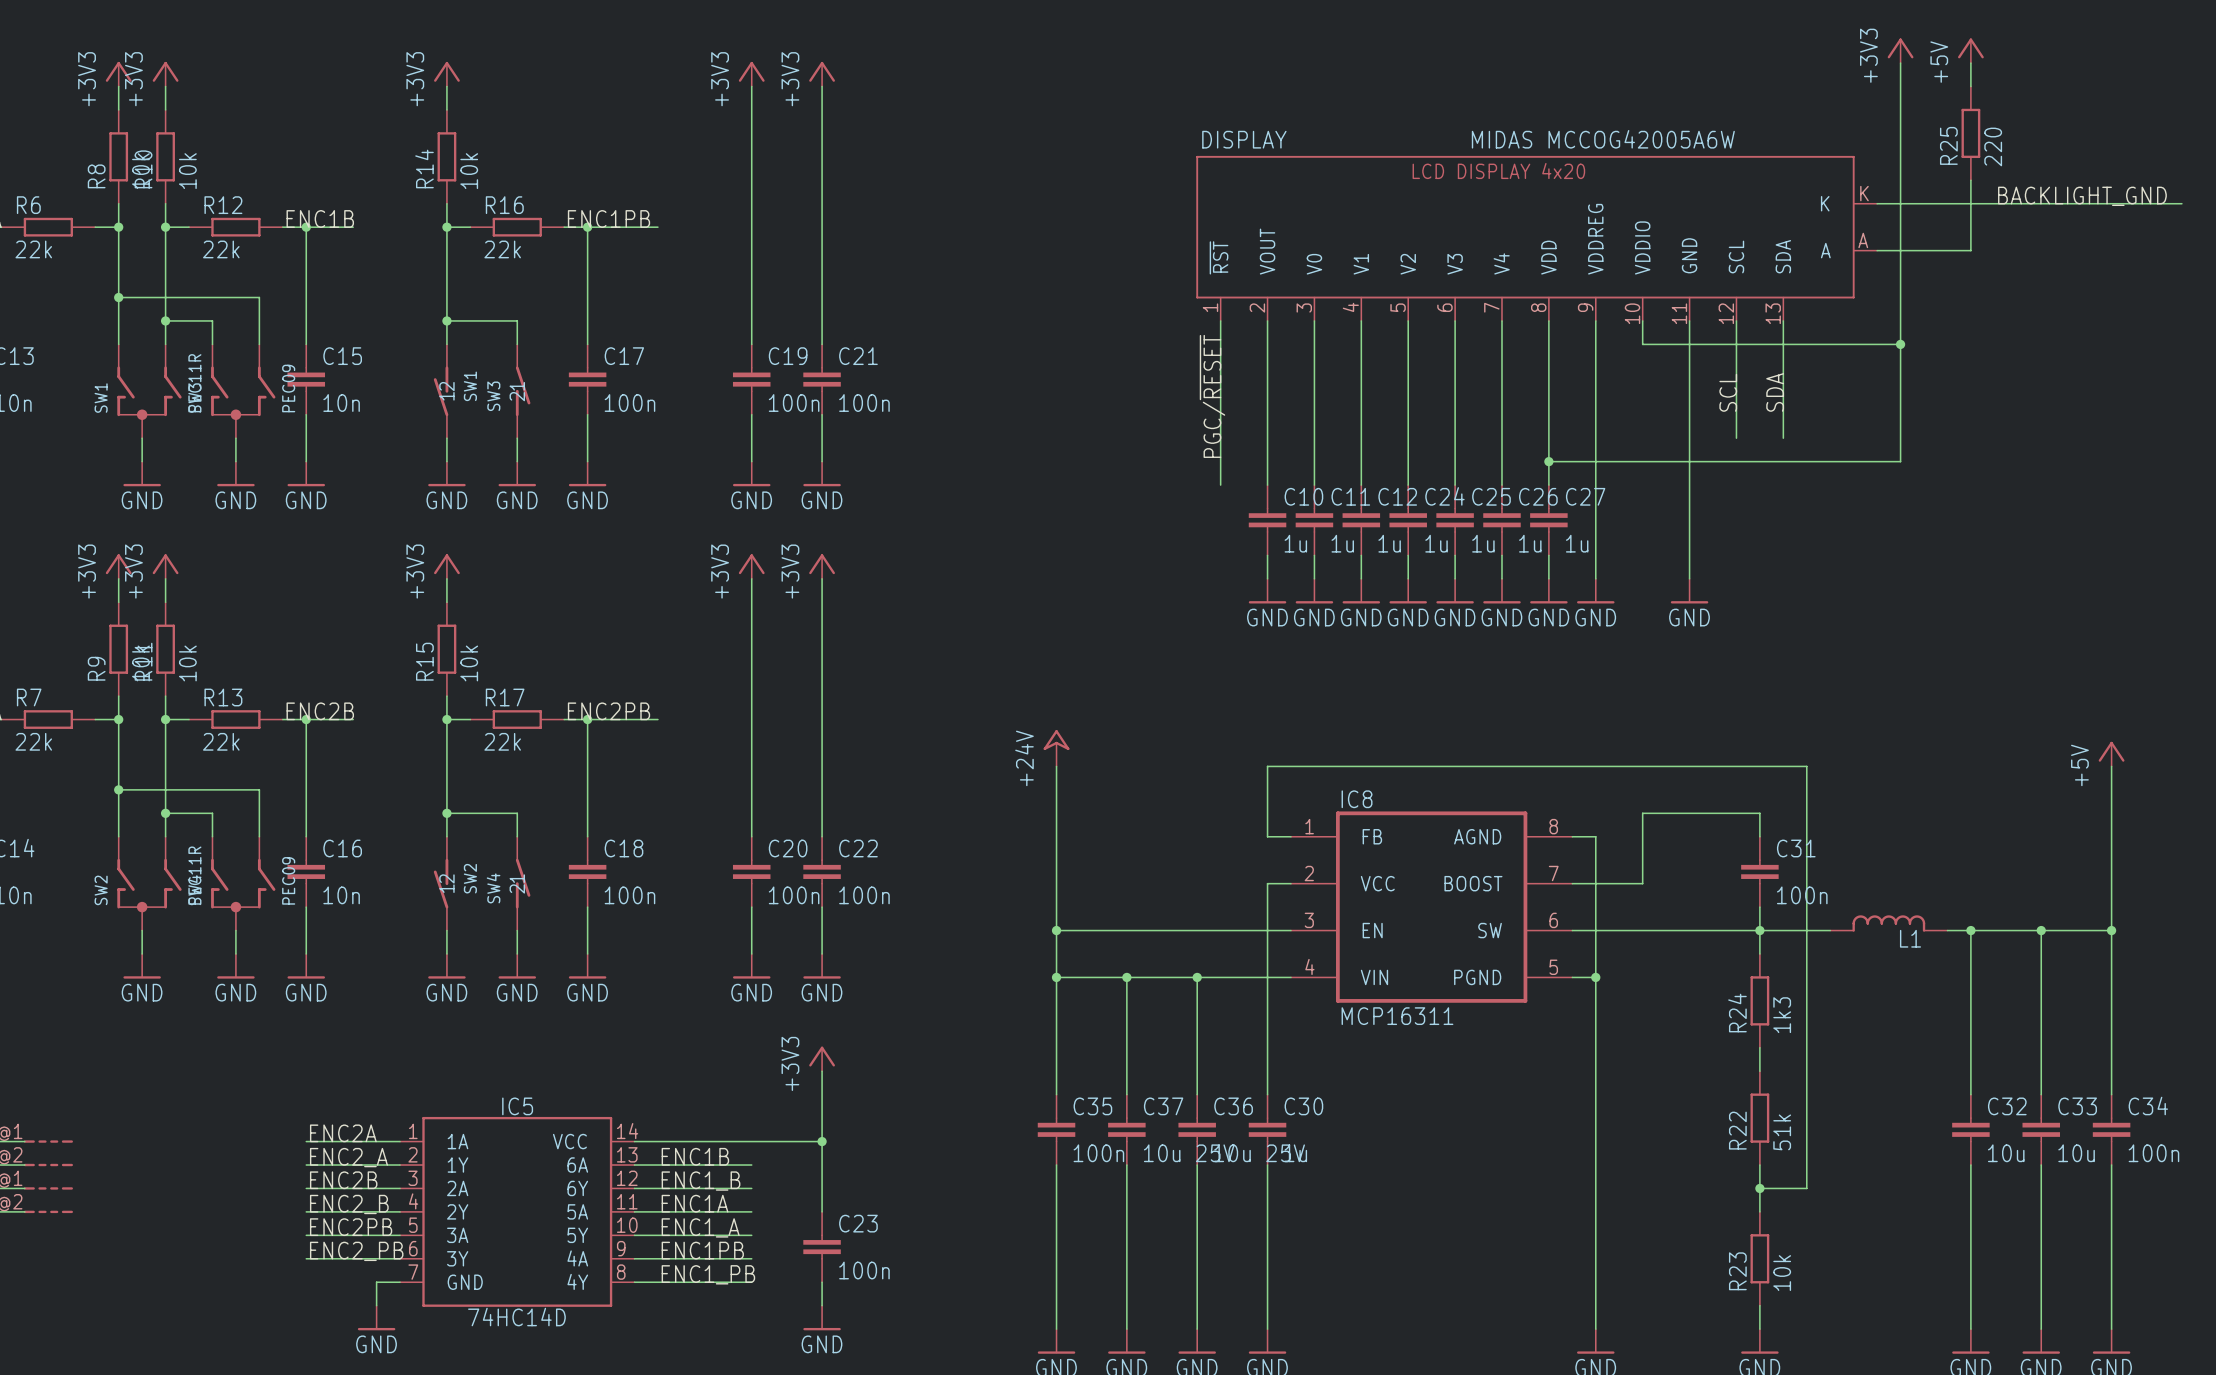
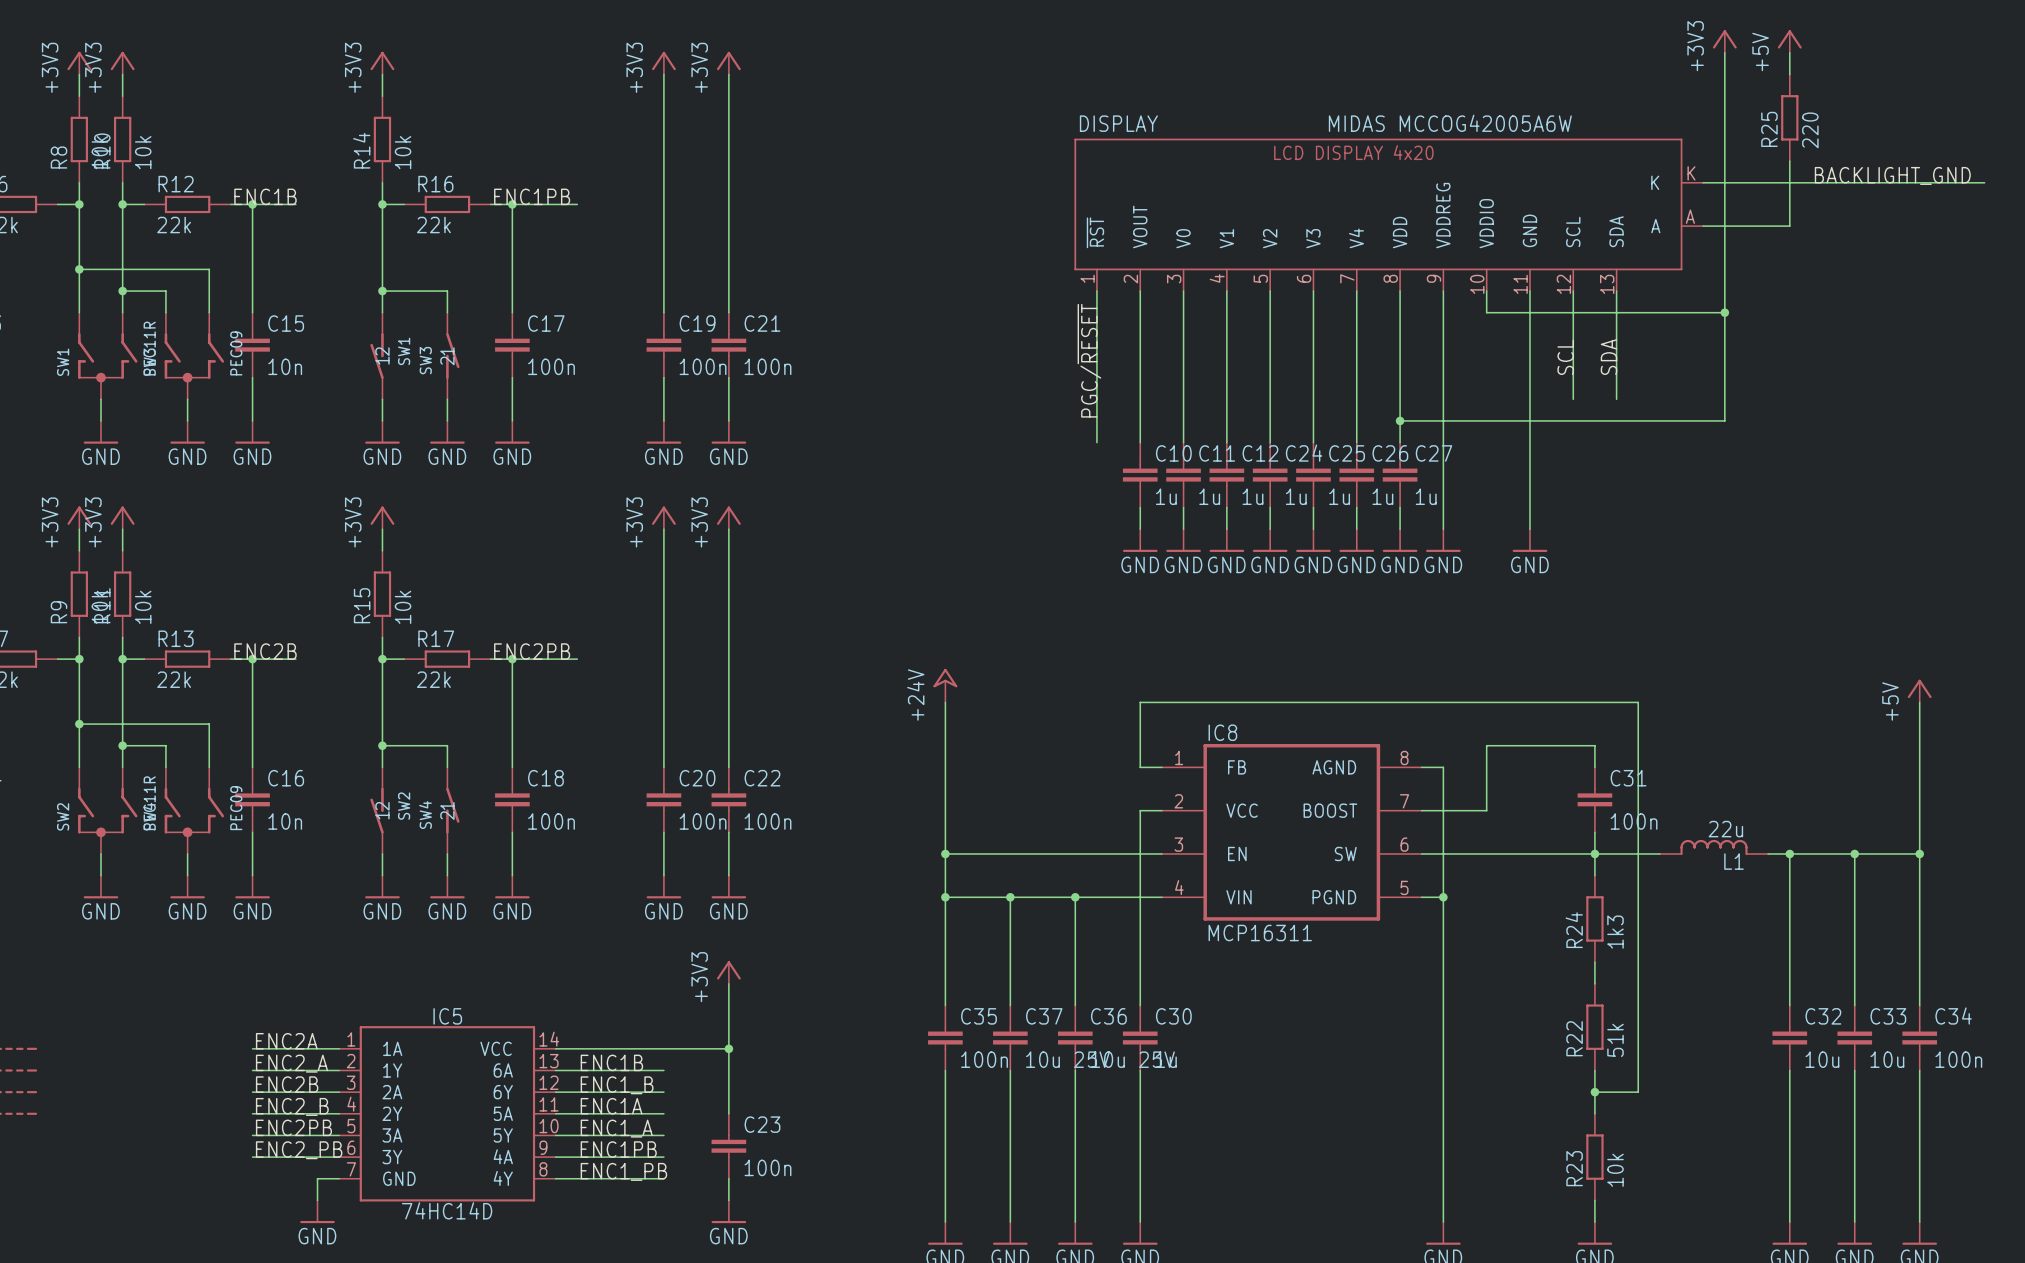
L1 value: none -> 22u (1725, 829)

